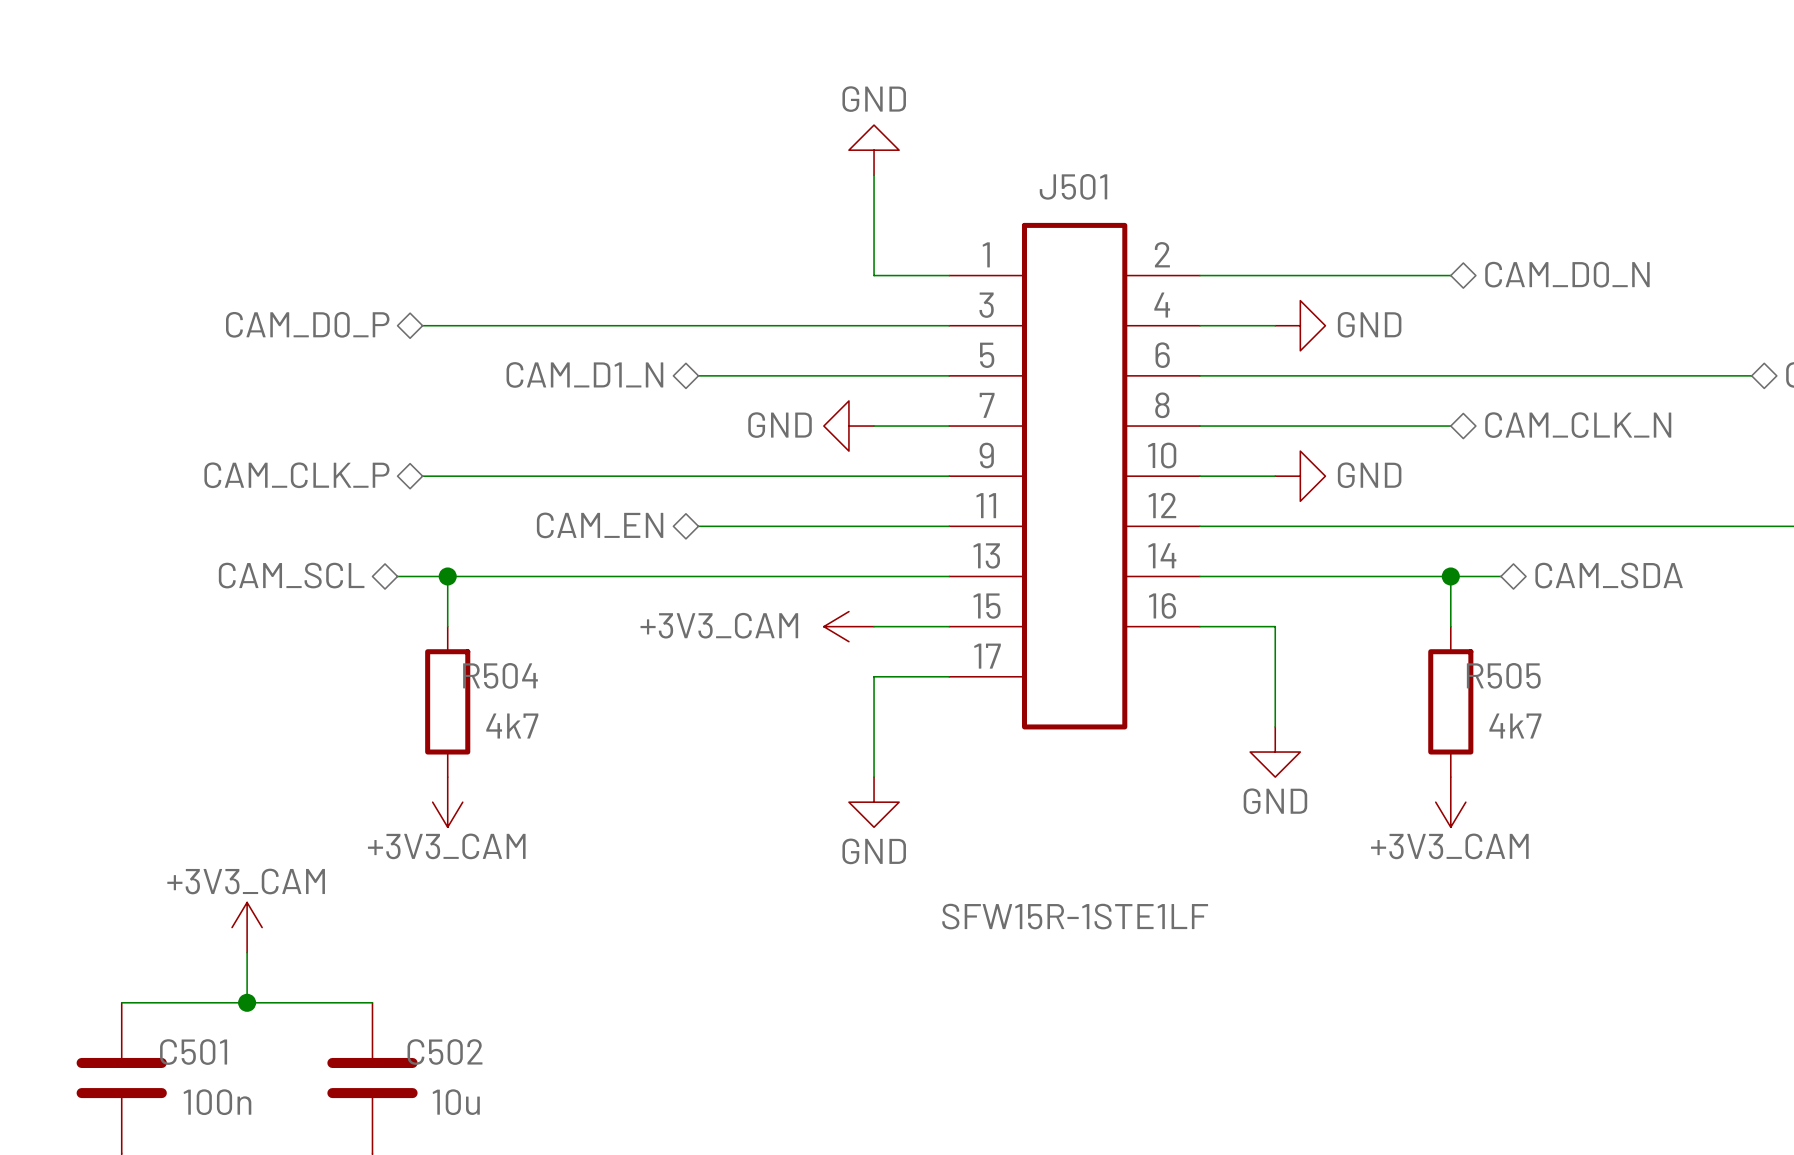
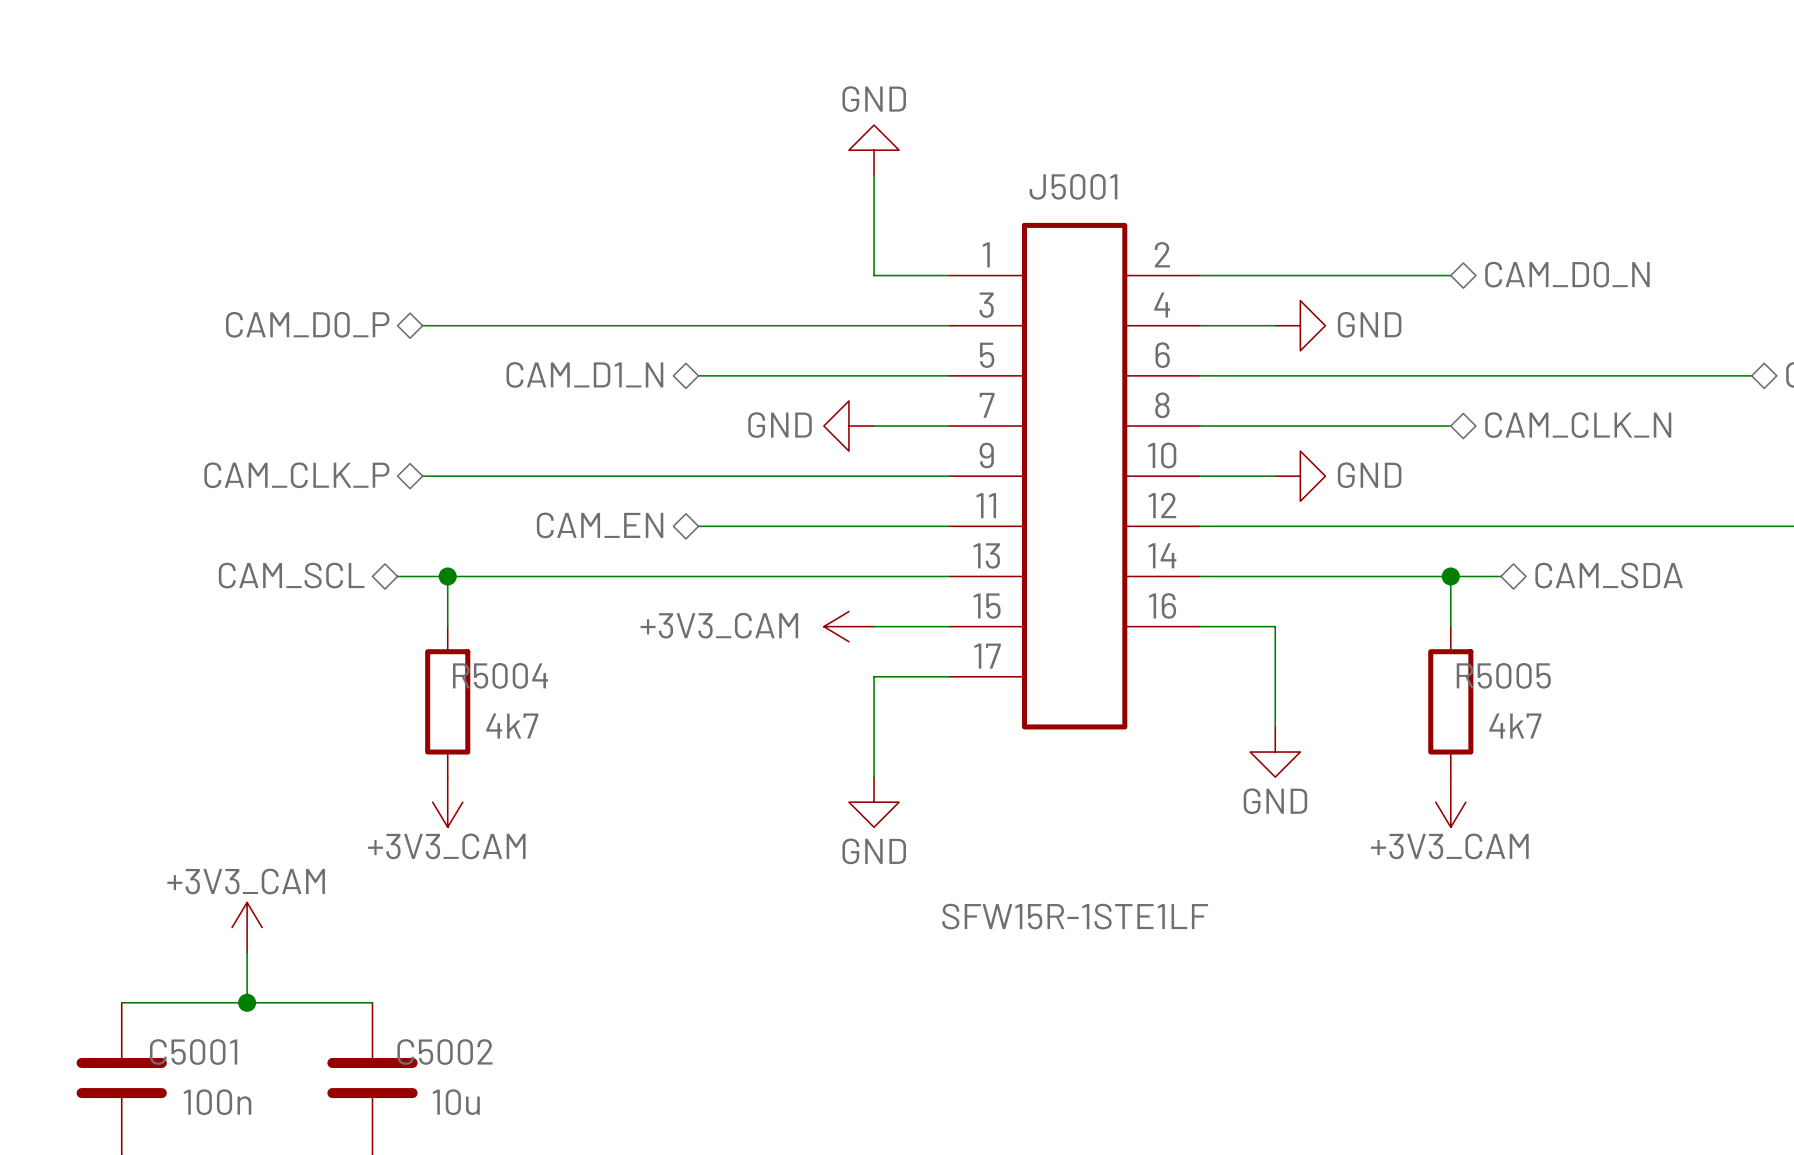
J501 name: J501 (1073, 186) -> J5001 (1073, 186)
R504 name: R504 (500, 675) -> R5004 (500, 675)
R505 name: R505 (1503, 675) -> R5005 (1503, 675)
C501 name: C501 (193, 1052) -> C5001 (193, 1052)
C502 name: C502 (444, 1052) -> C5002 (444, 1052)

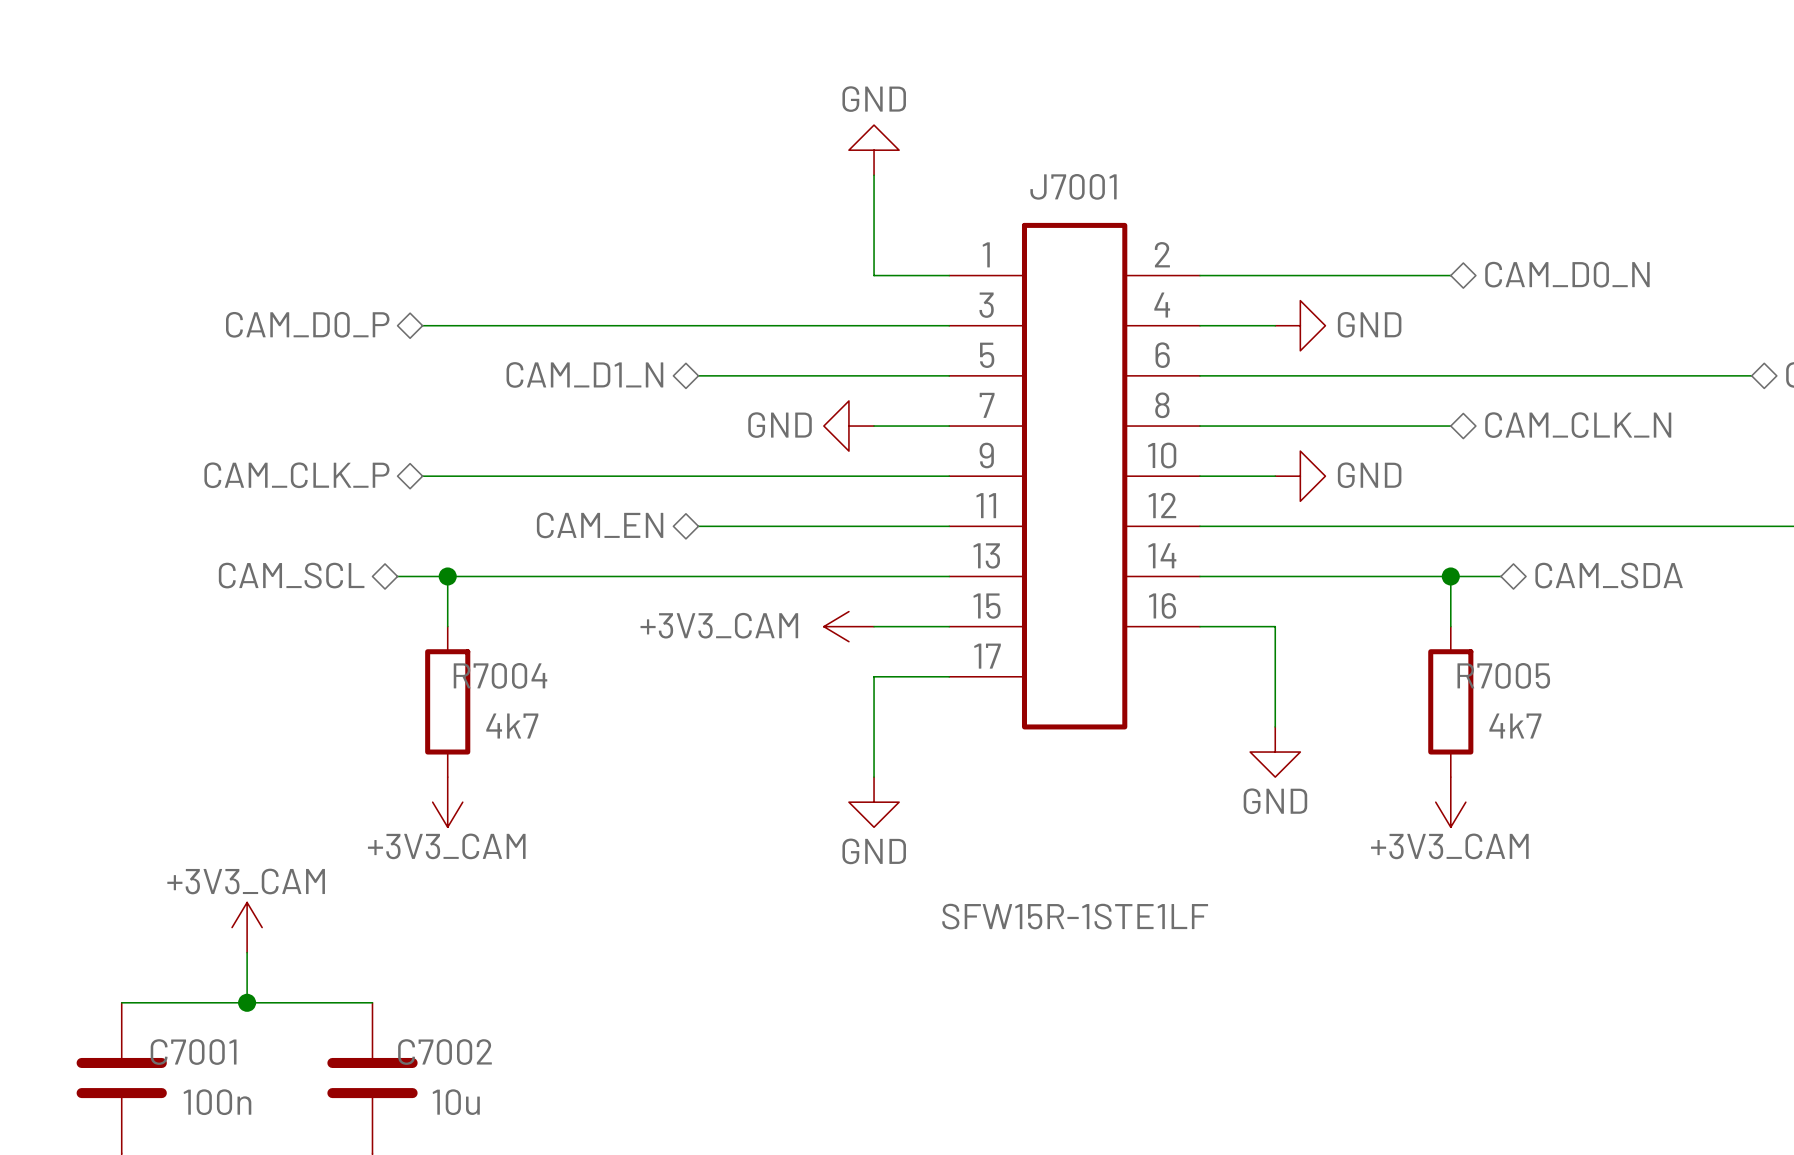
J5001 name: J5001 (1073, 186) -> J7001 (1073, 186)
R5004 name: R5004 (500, 675) -> R7004 (500, 675)
R5005 name: R5005 (1503, 675) -> R7005 (1503, 675)
C5001 name: C5001 (193, 1052) -> C7001 (193, 1052)
C5002 name: C5002 (444, 1052) -> C7002 (444, 1052)

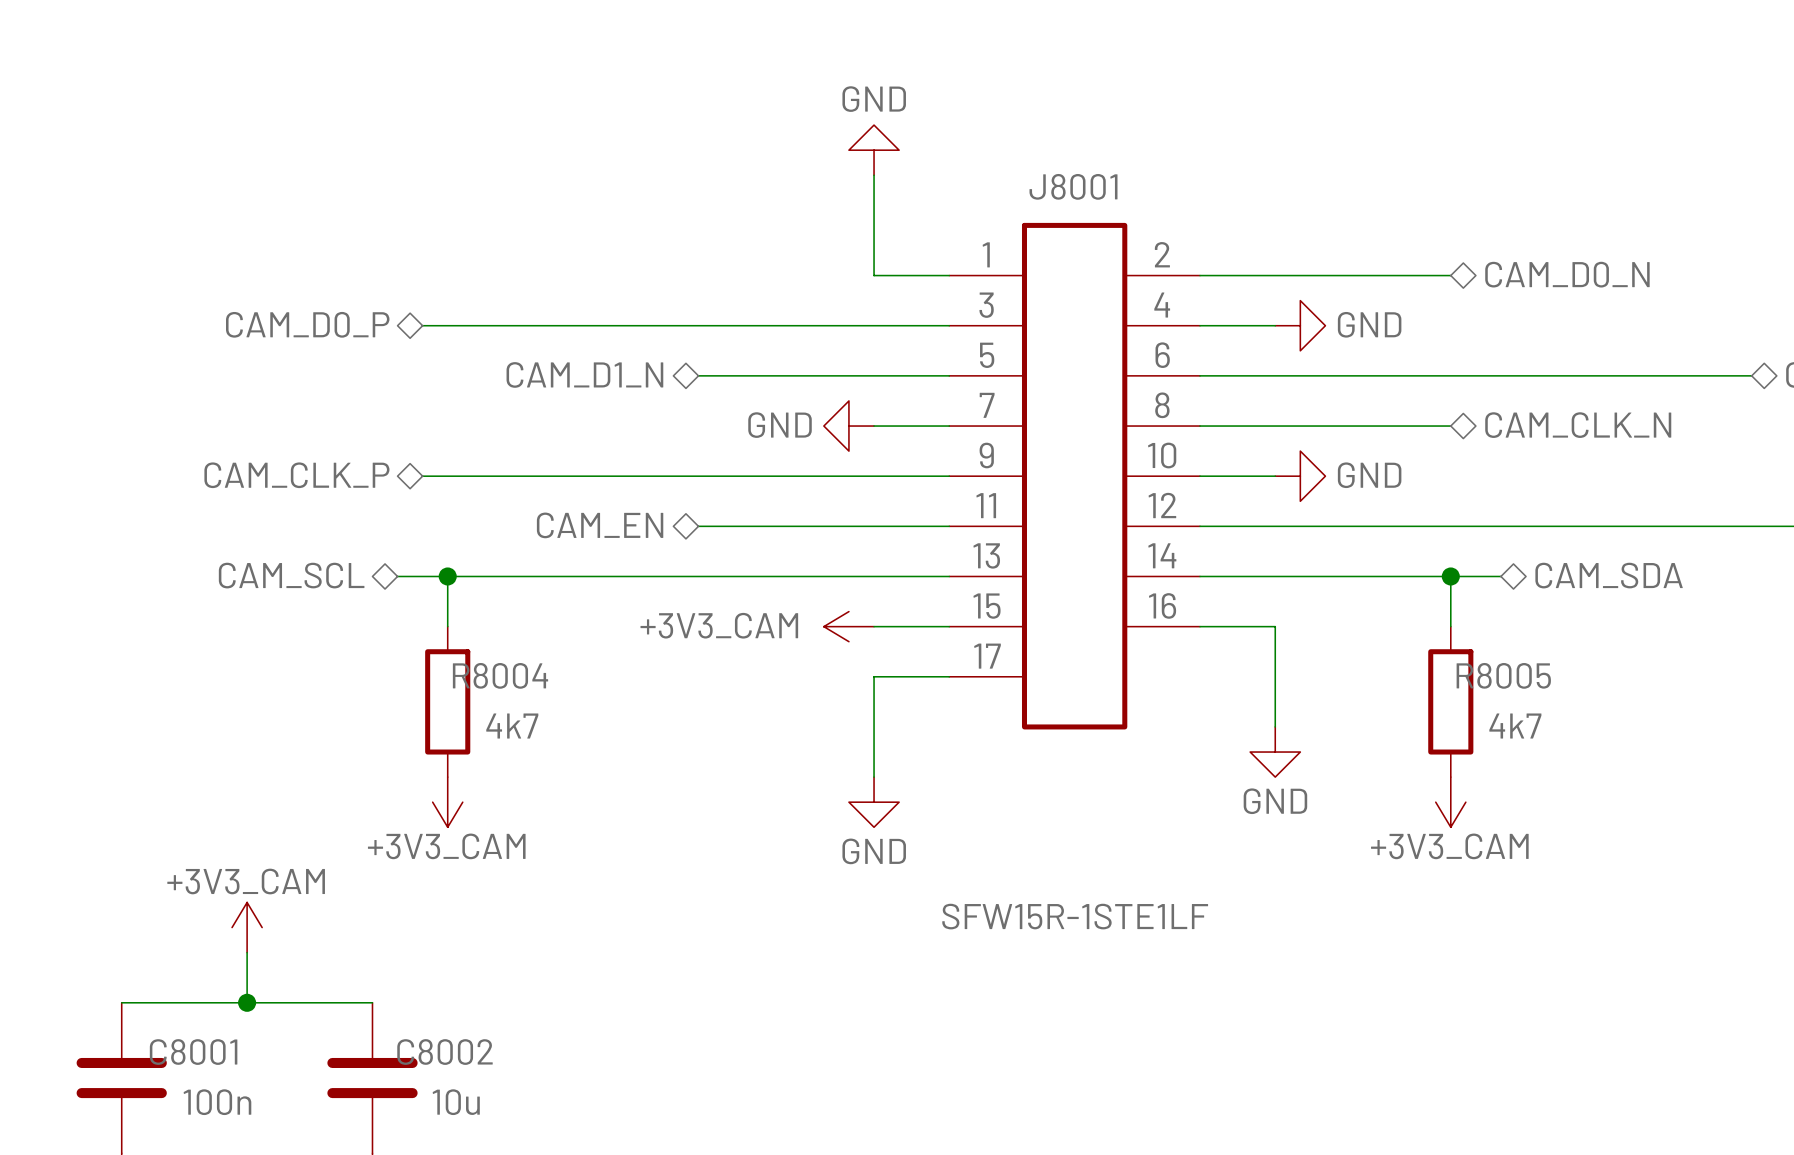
J7001 name: J7001 (1073, 186) -> J8001 (1073, 186)
R7004 name: R7004 (500, 675) -> R8004 (500, 675)
R7005 name: R7005 (1503, 675) -> R8005 (1503, 675)
C7001 name: C7001 (193, 1052) -> C8001 (193, 1052)
C7002 name: C7002 (444, 1052) -> C8002 (444, 1052)

